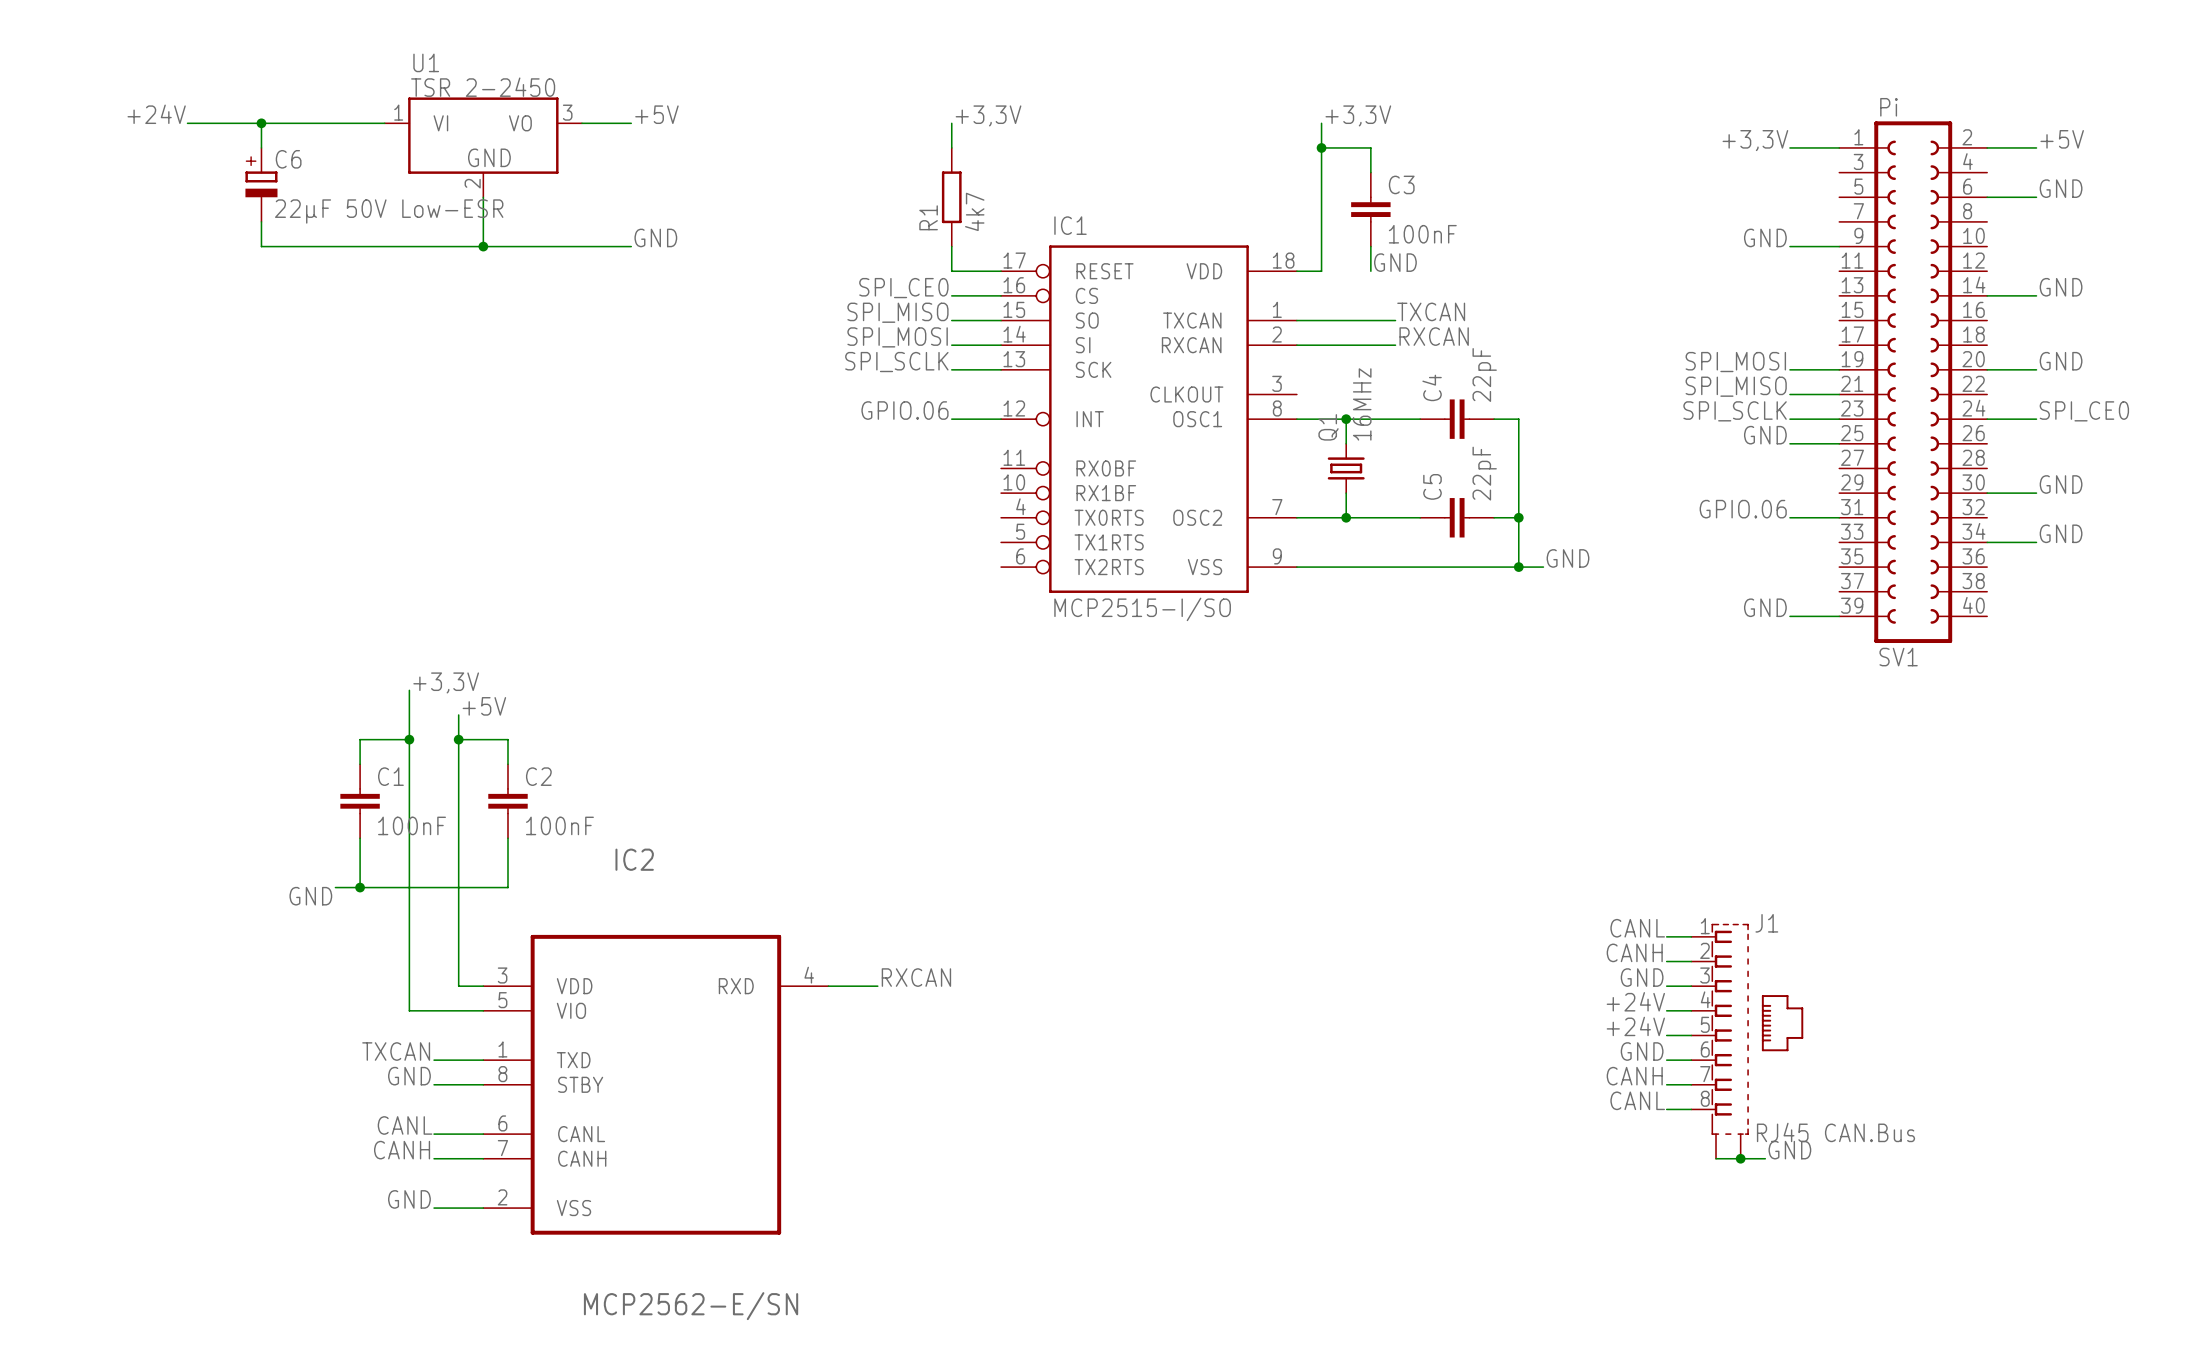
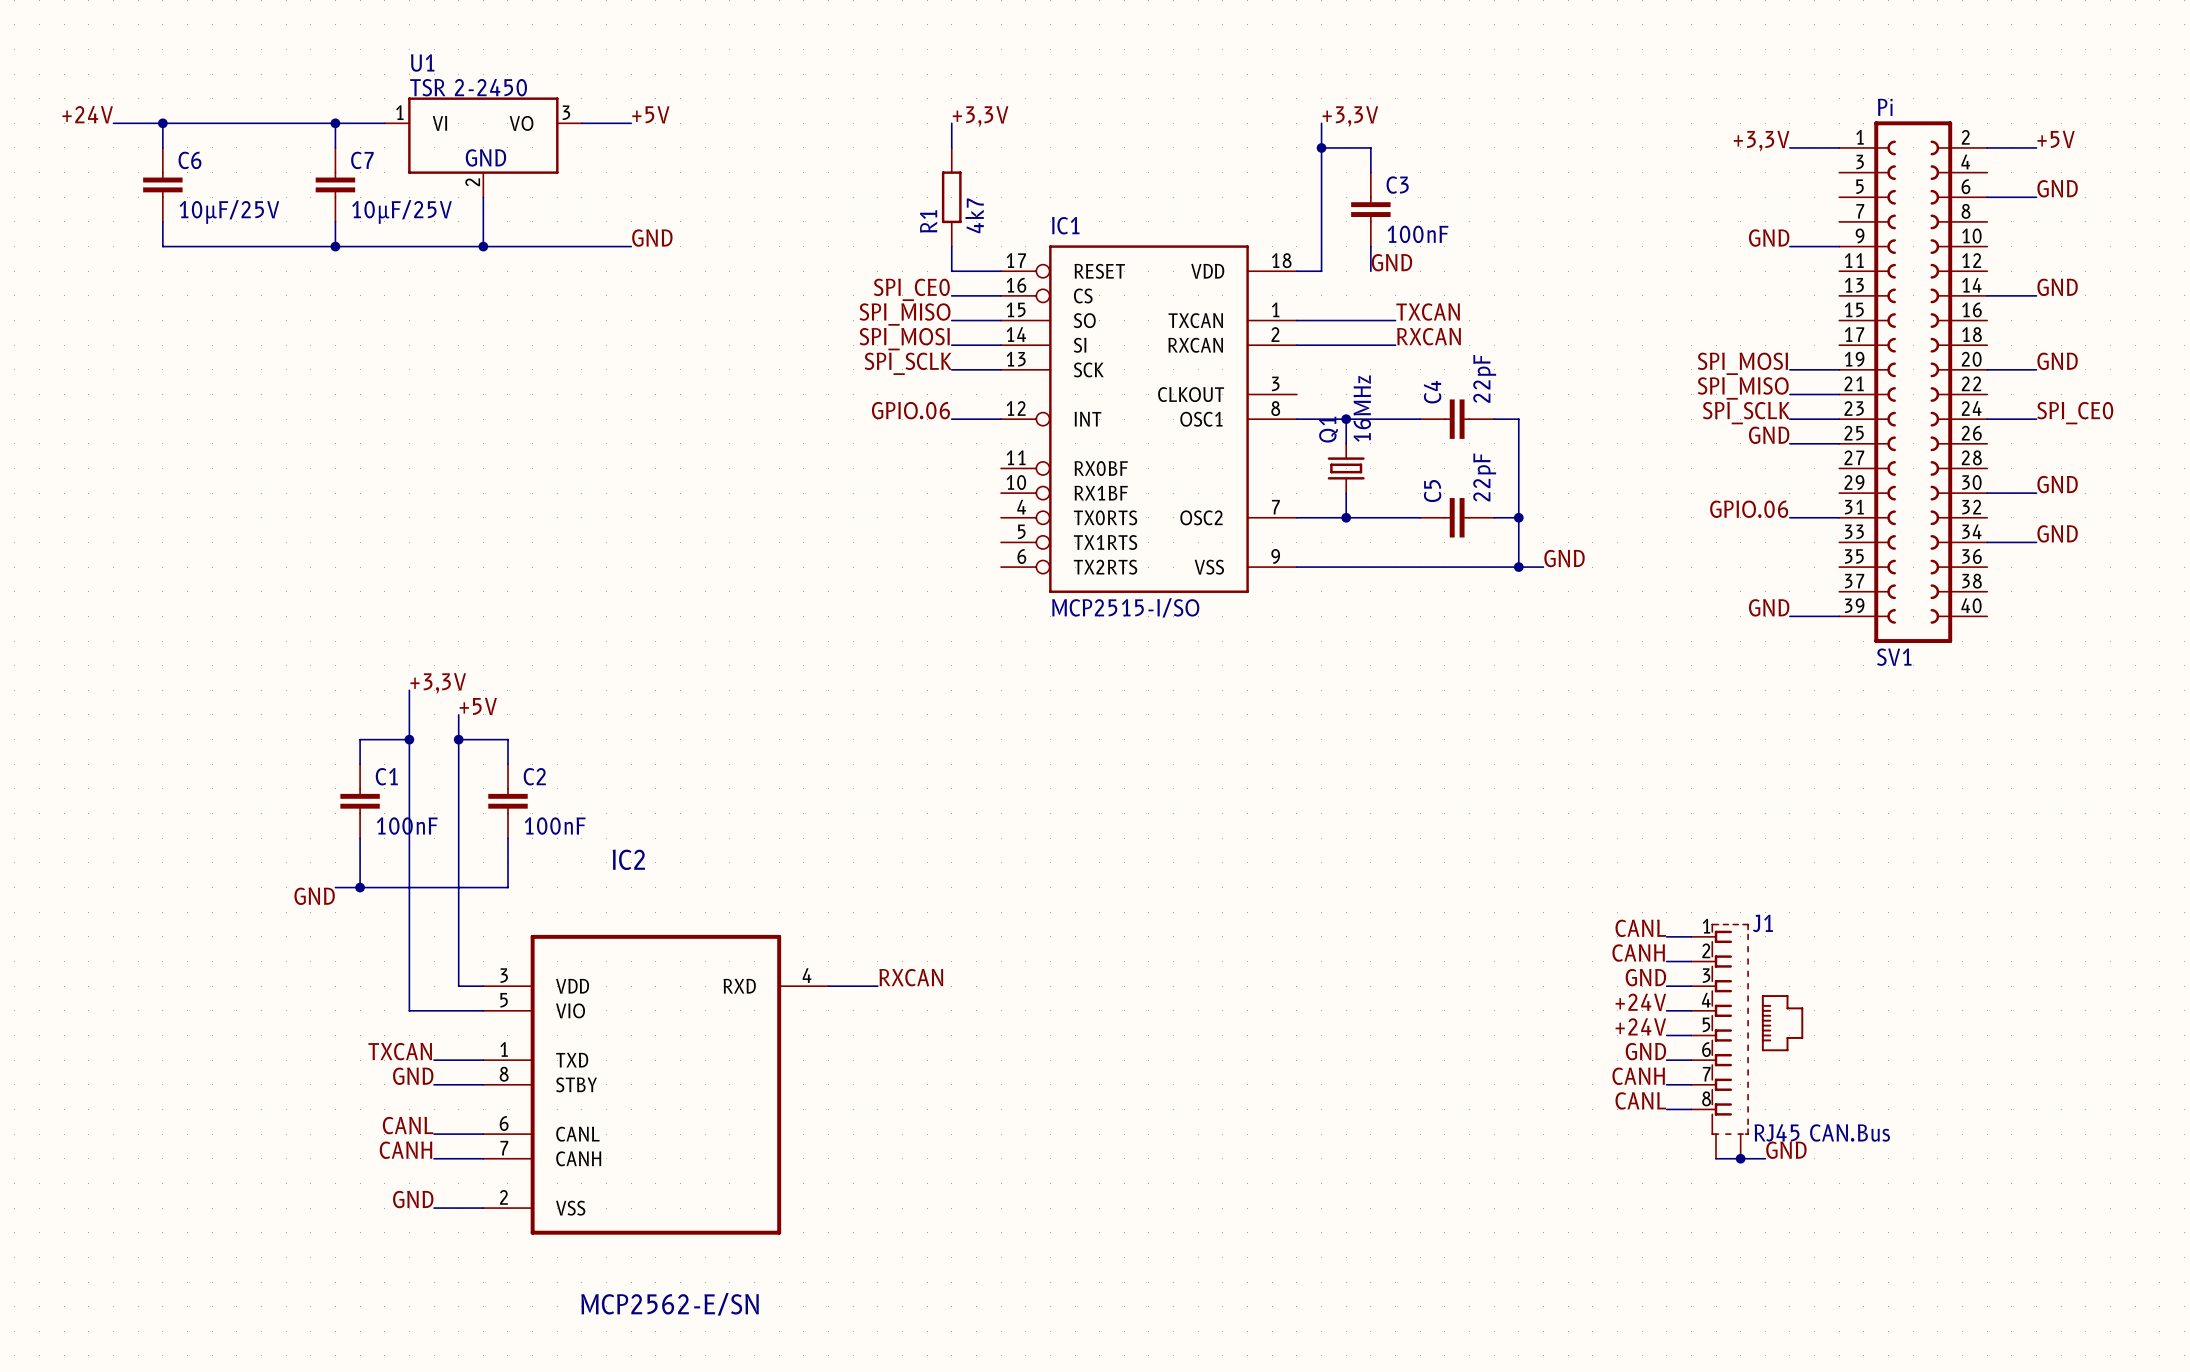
label position: +24V (156, 114) -> +24V (87, 114)
wire: none -> (113, 123) (187, 123)
wire: none -> (162, 123) (162, 147)
junction: none -> (162, 123)
wire: (261, 123) (261, 147) -> (335, 123) (335, 147)
junction: (261, 123) -> none
junction: none -> (335, 123)
C6 symbol: [245, 147, 278, 222] -> [143, 147, 183, 222]
C7: none -> 10µF/25V (335, 184)
C6 value: 22µF 50V Low-ESR (389, 211) -> 10µF/25V (229, 211)
wire: (261, 221) (261, 246) -> (162, 221) (162, 246) (261, 246)
wire: none -> (335, 221) (335, 246)
junction: none -> (335, 246)

